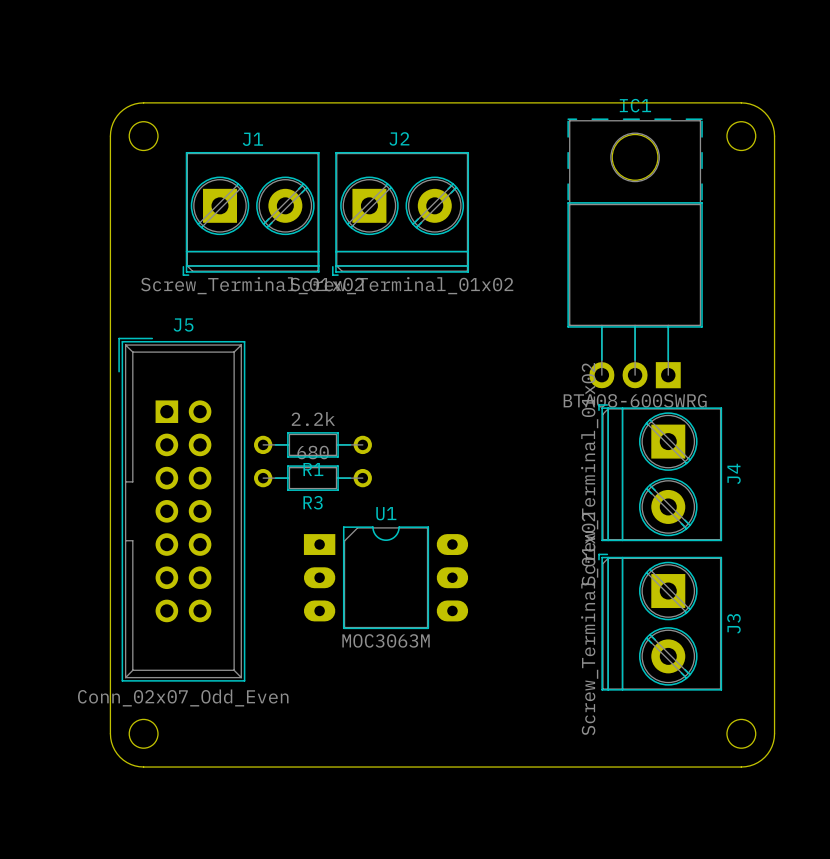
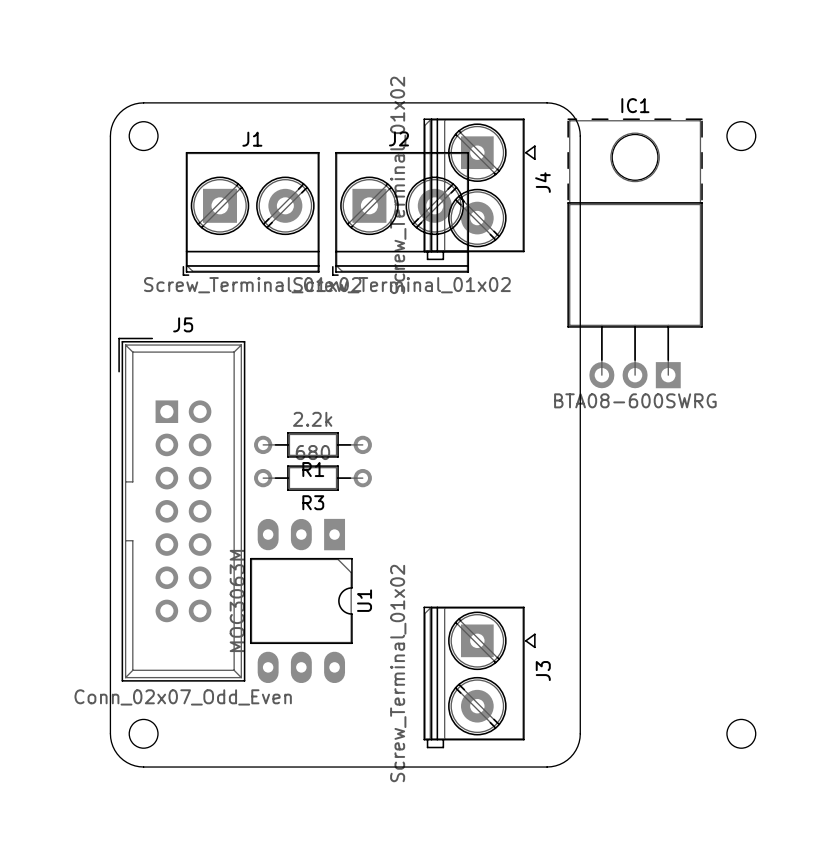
board edge: (547, 102) (745, 103) (757, 107) (767, 115) (773, 127) (774, 136) (774, 733) (772, 746) (761, 760) (745, 766) (547, 767) -> (547, 102) (559, 105) (570, 112) (577, 123) (580, 136) (580, 733) (577, 746) (570, 757) (559, 764) (547, 767)
J4 footprint: [598, 404, 723, 542] -> [423, 118, 536, 261]
J3 footprint: [598, 553, 723, 691] -> [423, 606, 536, 749]
U1 rotation: 0° (386, 577) -> 90° clockwise (301, 600)

